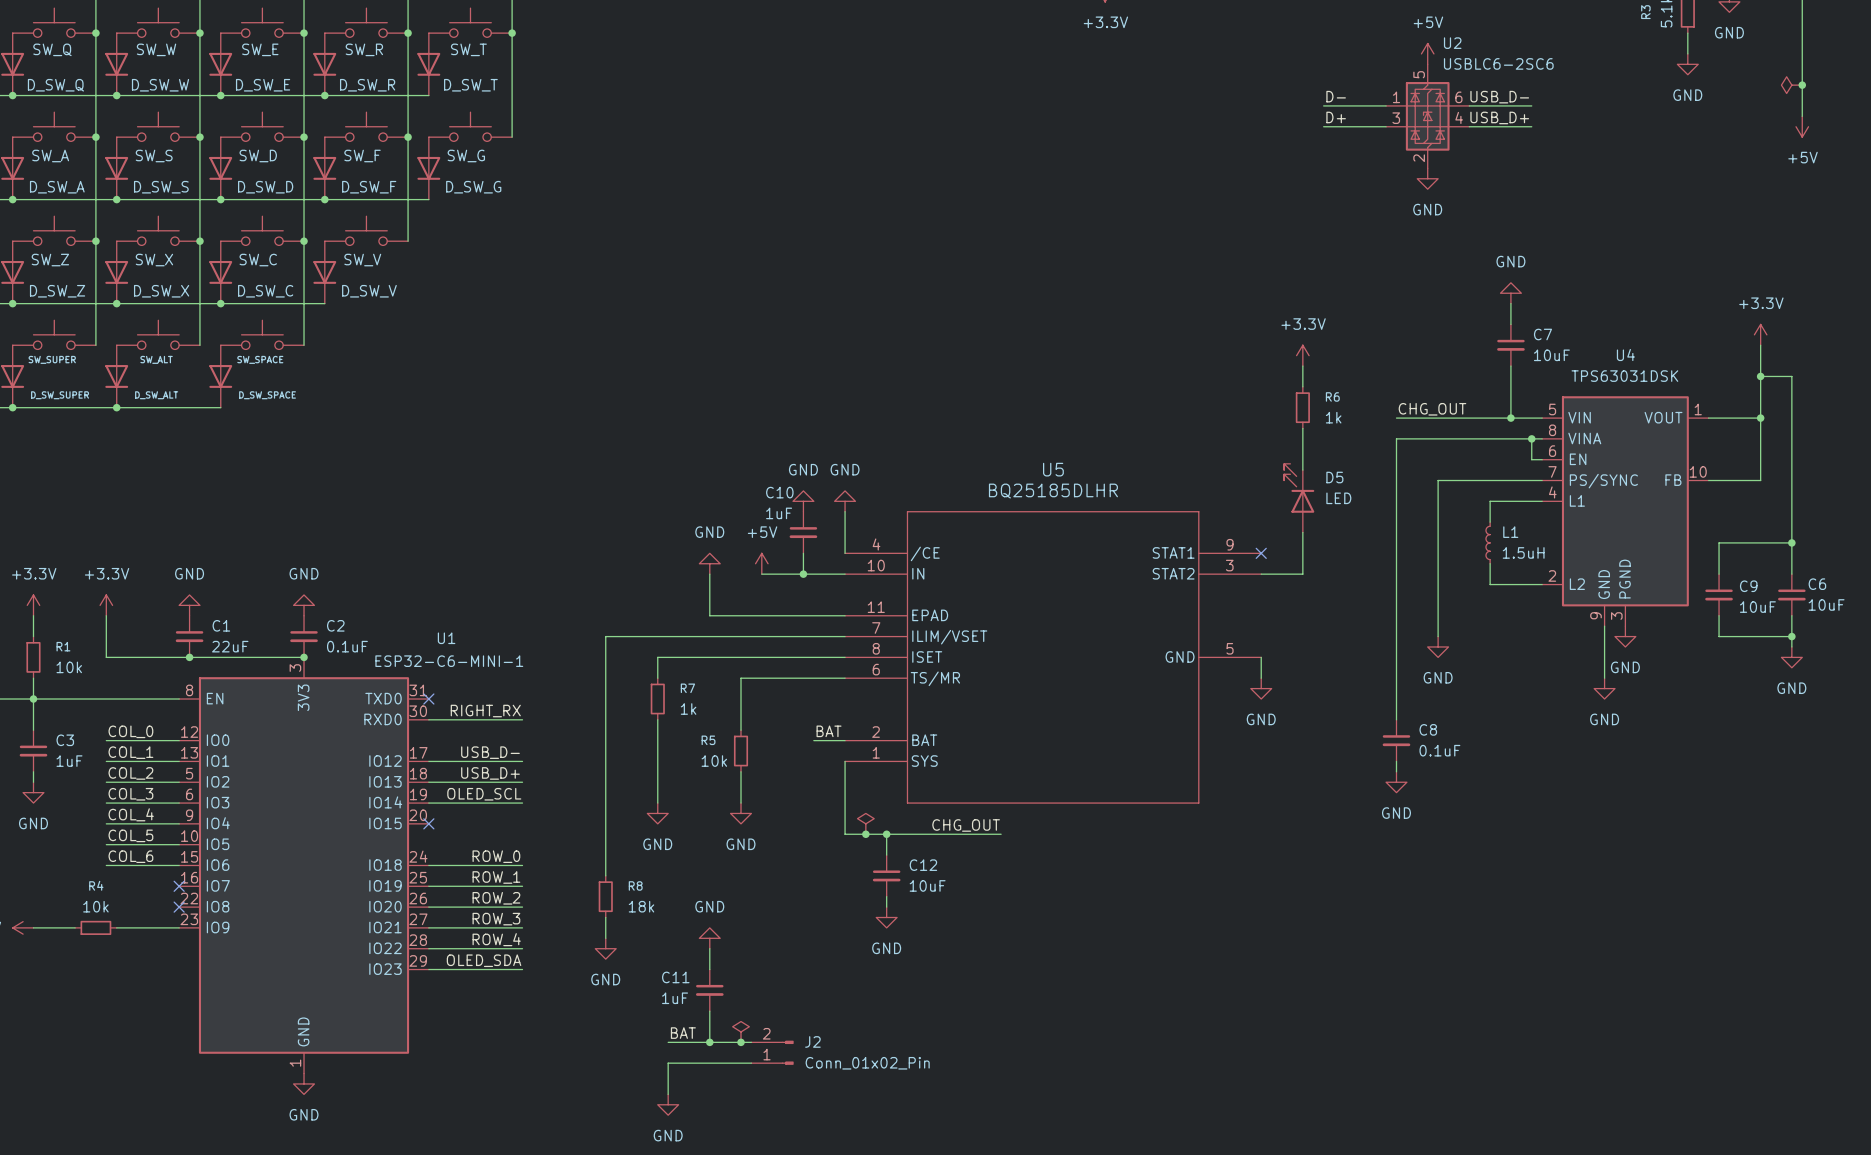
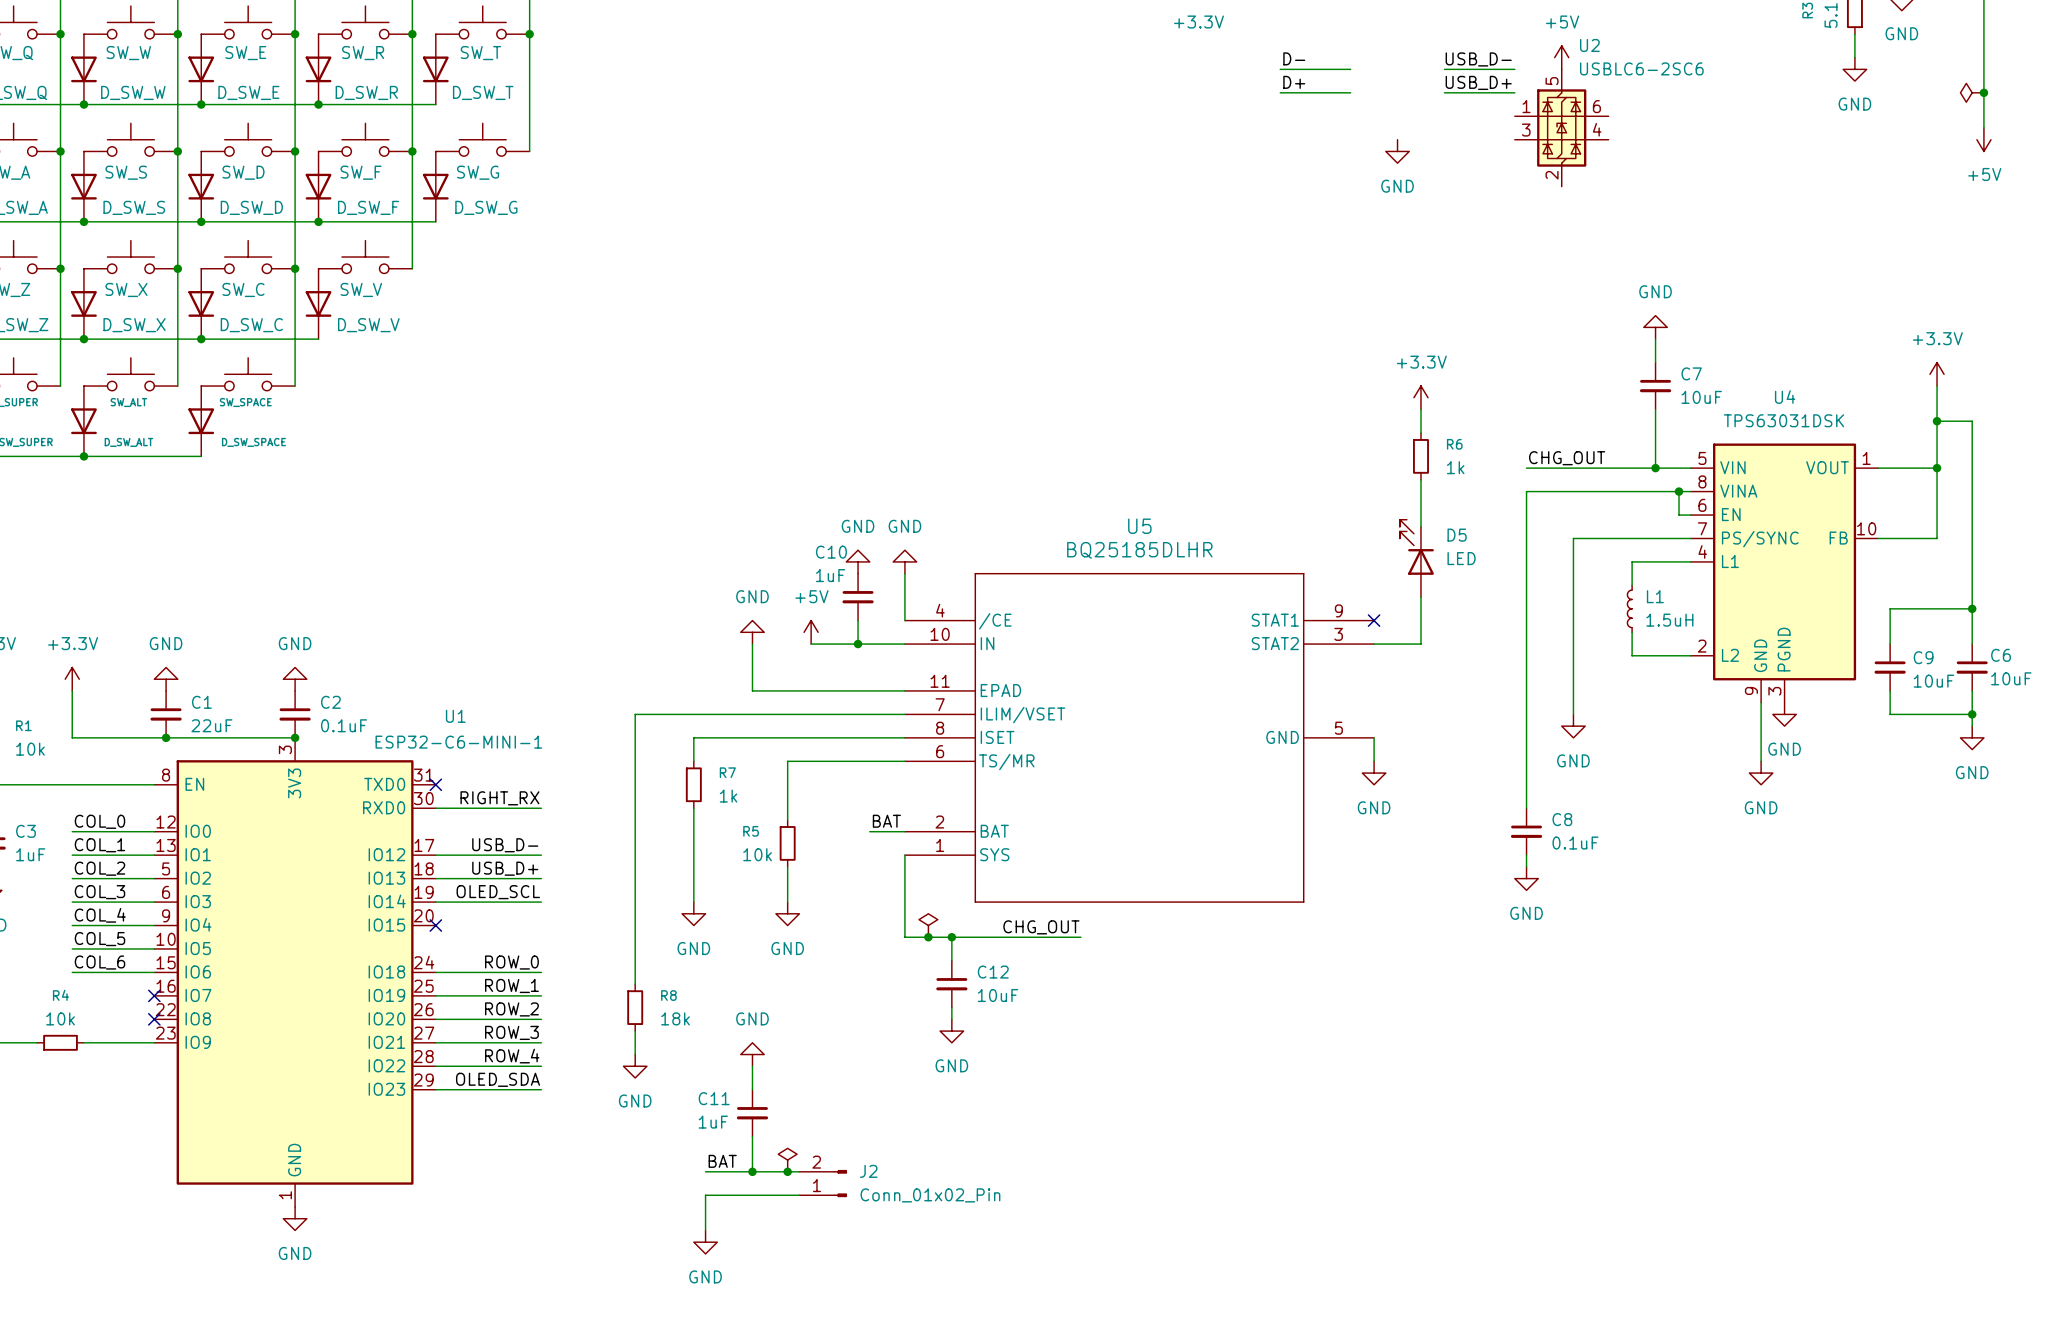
label position: D- (1336, 96) -> D- (1294, 58)
label position: USB_D- (1499, 97) -> USB_D- (1478, 59)
wire: (1323, 105) (1386, 105) -> (1280, 69) (1350, 69)
wire: (1469, 105) (1531, 105) -> (1444, 69) (1514, 69)
label position: D+ (1336, 117) -> D+ (1294, 82)
label position: USB_D+ (1499, 117) -> USB_D+ (1478, 82)
wire: (1323, 126) (1386, 126) -> (1280, 92) (1350, 92)
wire: (1469, 126) (1531, 126) -> (1444, 92) (1514, 92)
power symbol position: GND (1427, 178) -> GND (1397, 151)

